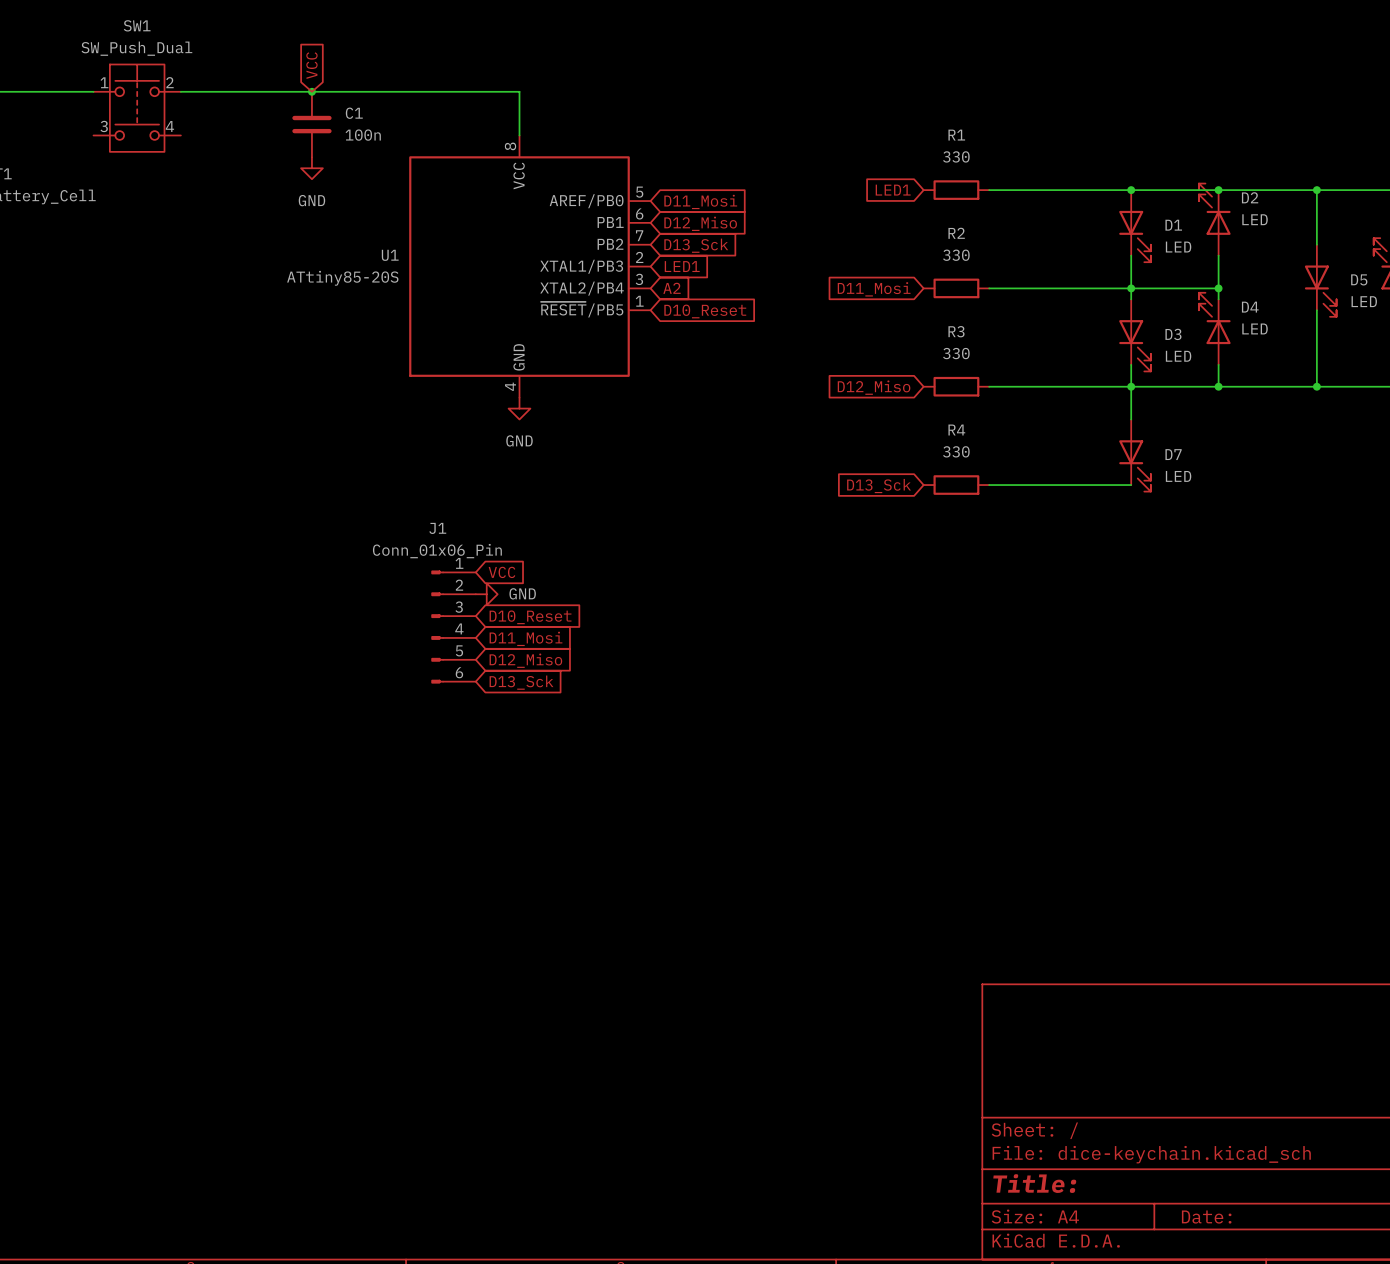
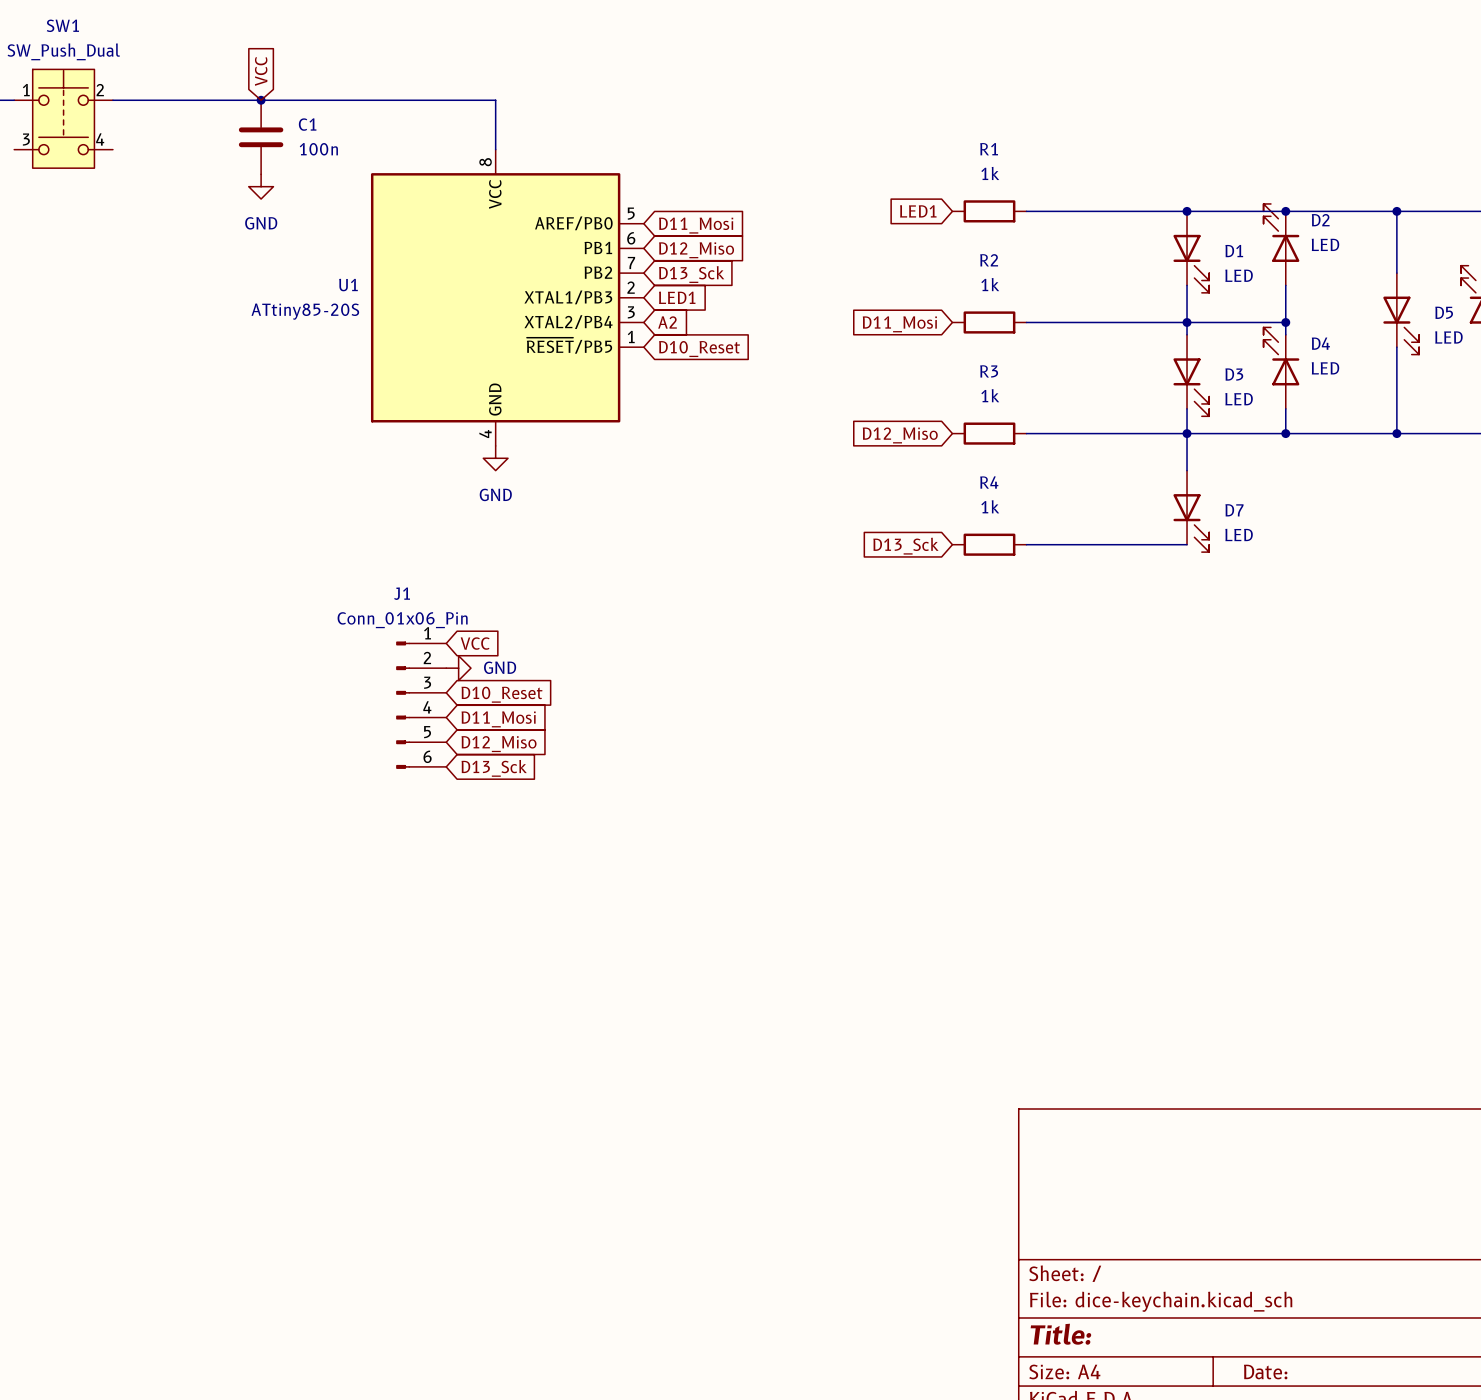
R1 value: 330 (956, 156) -> 1k (990, 173)
R2 value: 330 (956, 255) -> 1k (990, 284)
R3 value: 330 (956, 353) -> 1k (990, 395)
R4 value: 330 (956, 451) -> 1k (990, 506)

